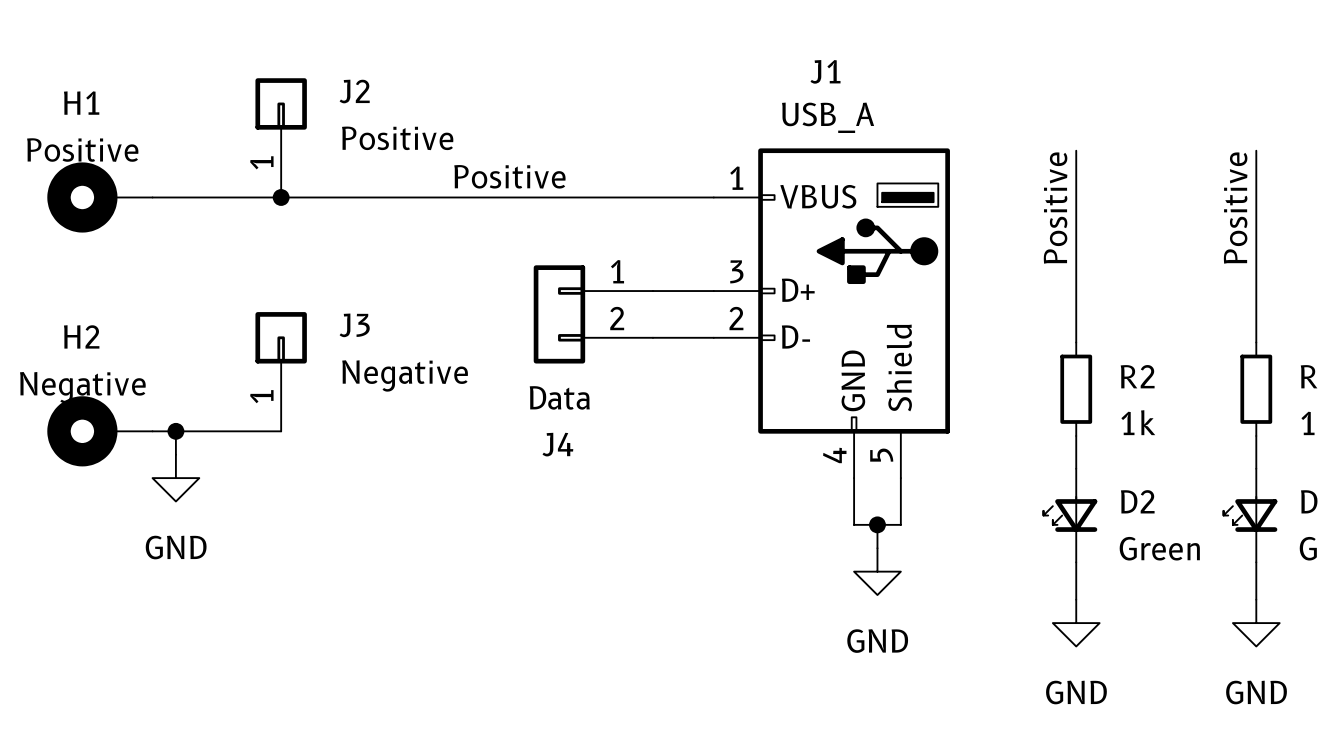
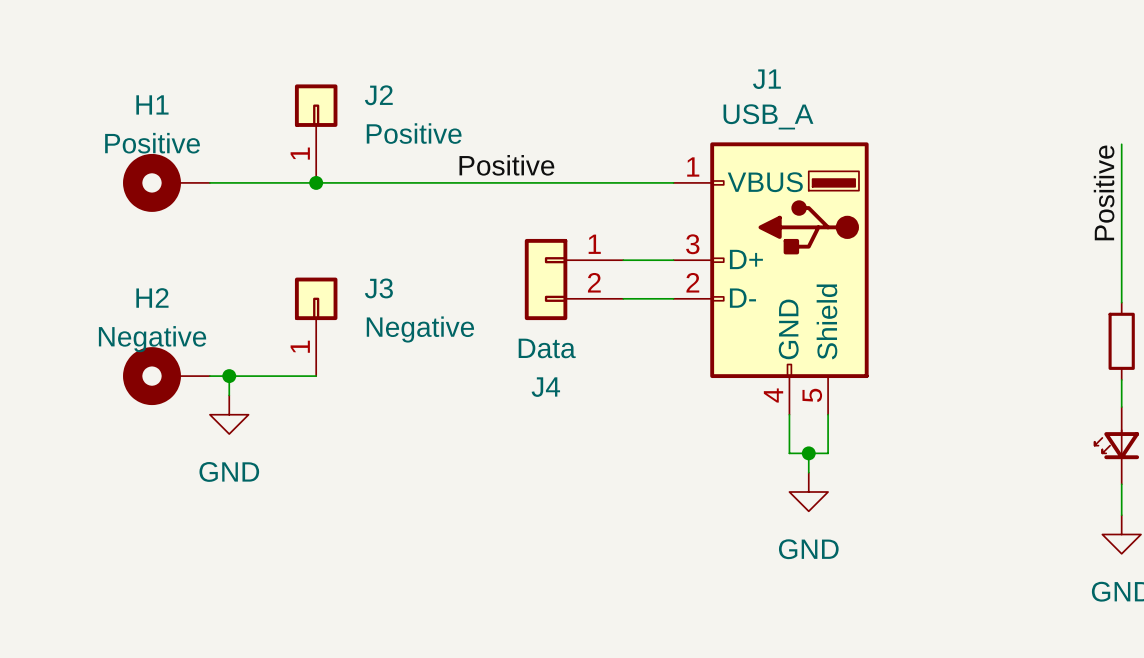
wire: (1076, 150) (1076, 342) -> none
label: Positive (1055, 208) -> none
R2: 1k (1076, 389) -> none
wire: (1076, 436) (1076, 468) -> none
D2: Green (1070, 515) -> none
wire: (1076, 562) (1076, 599) -> none
power symbol: GND (1076, 623) -> none

